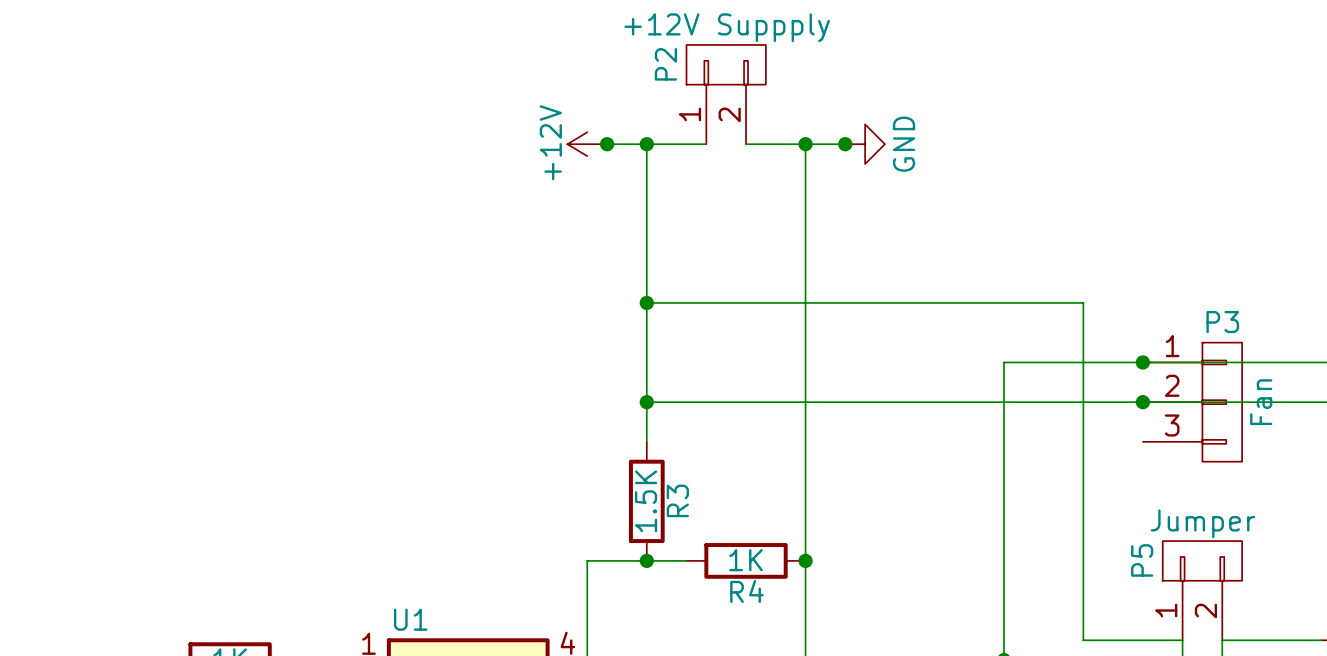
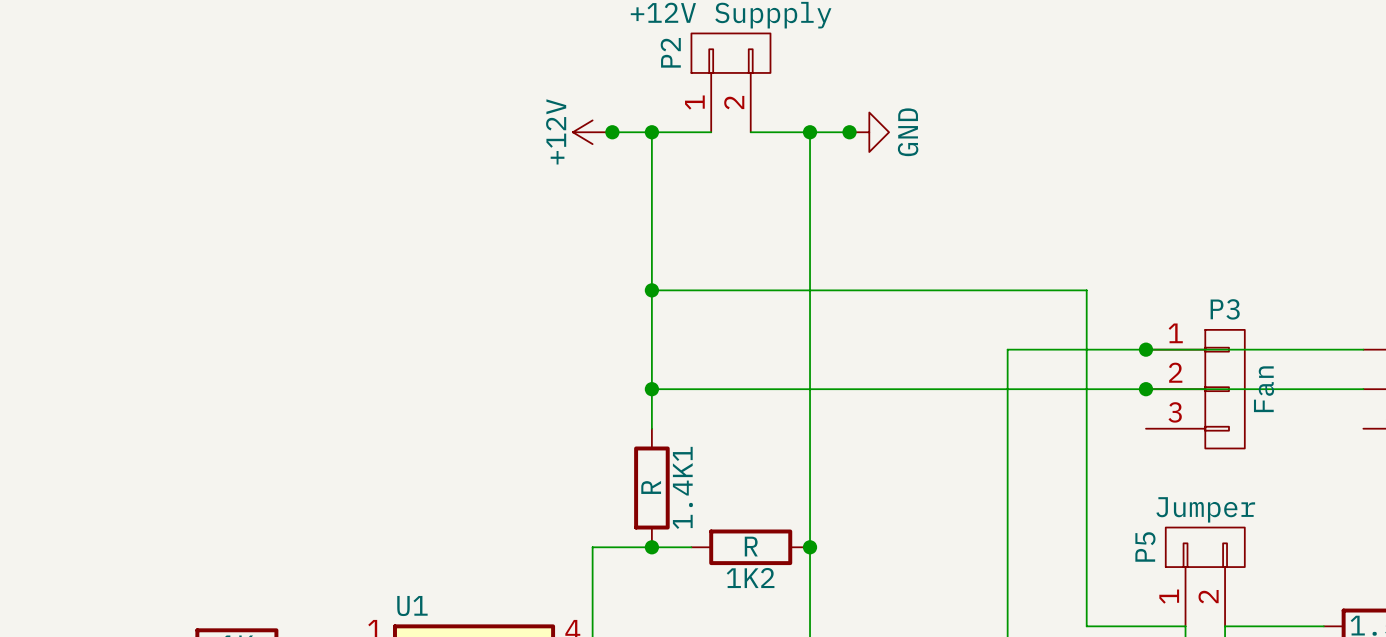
R3 name: R3 (677, 500) -> 1.4K1 (682, 487)
R3 value: 1.5K (646, 501) -> R (651, 487)
R4 value: 1K (746, 560) -> R (751, 546)
R4 name: R4 (746, 591) -> 1K2 (750, 578)

